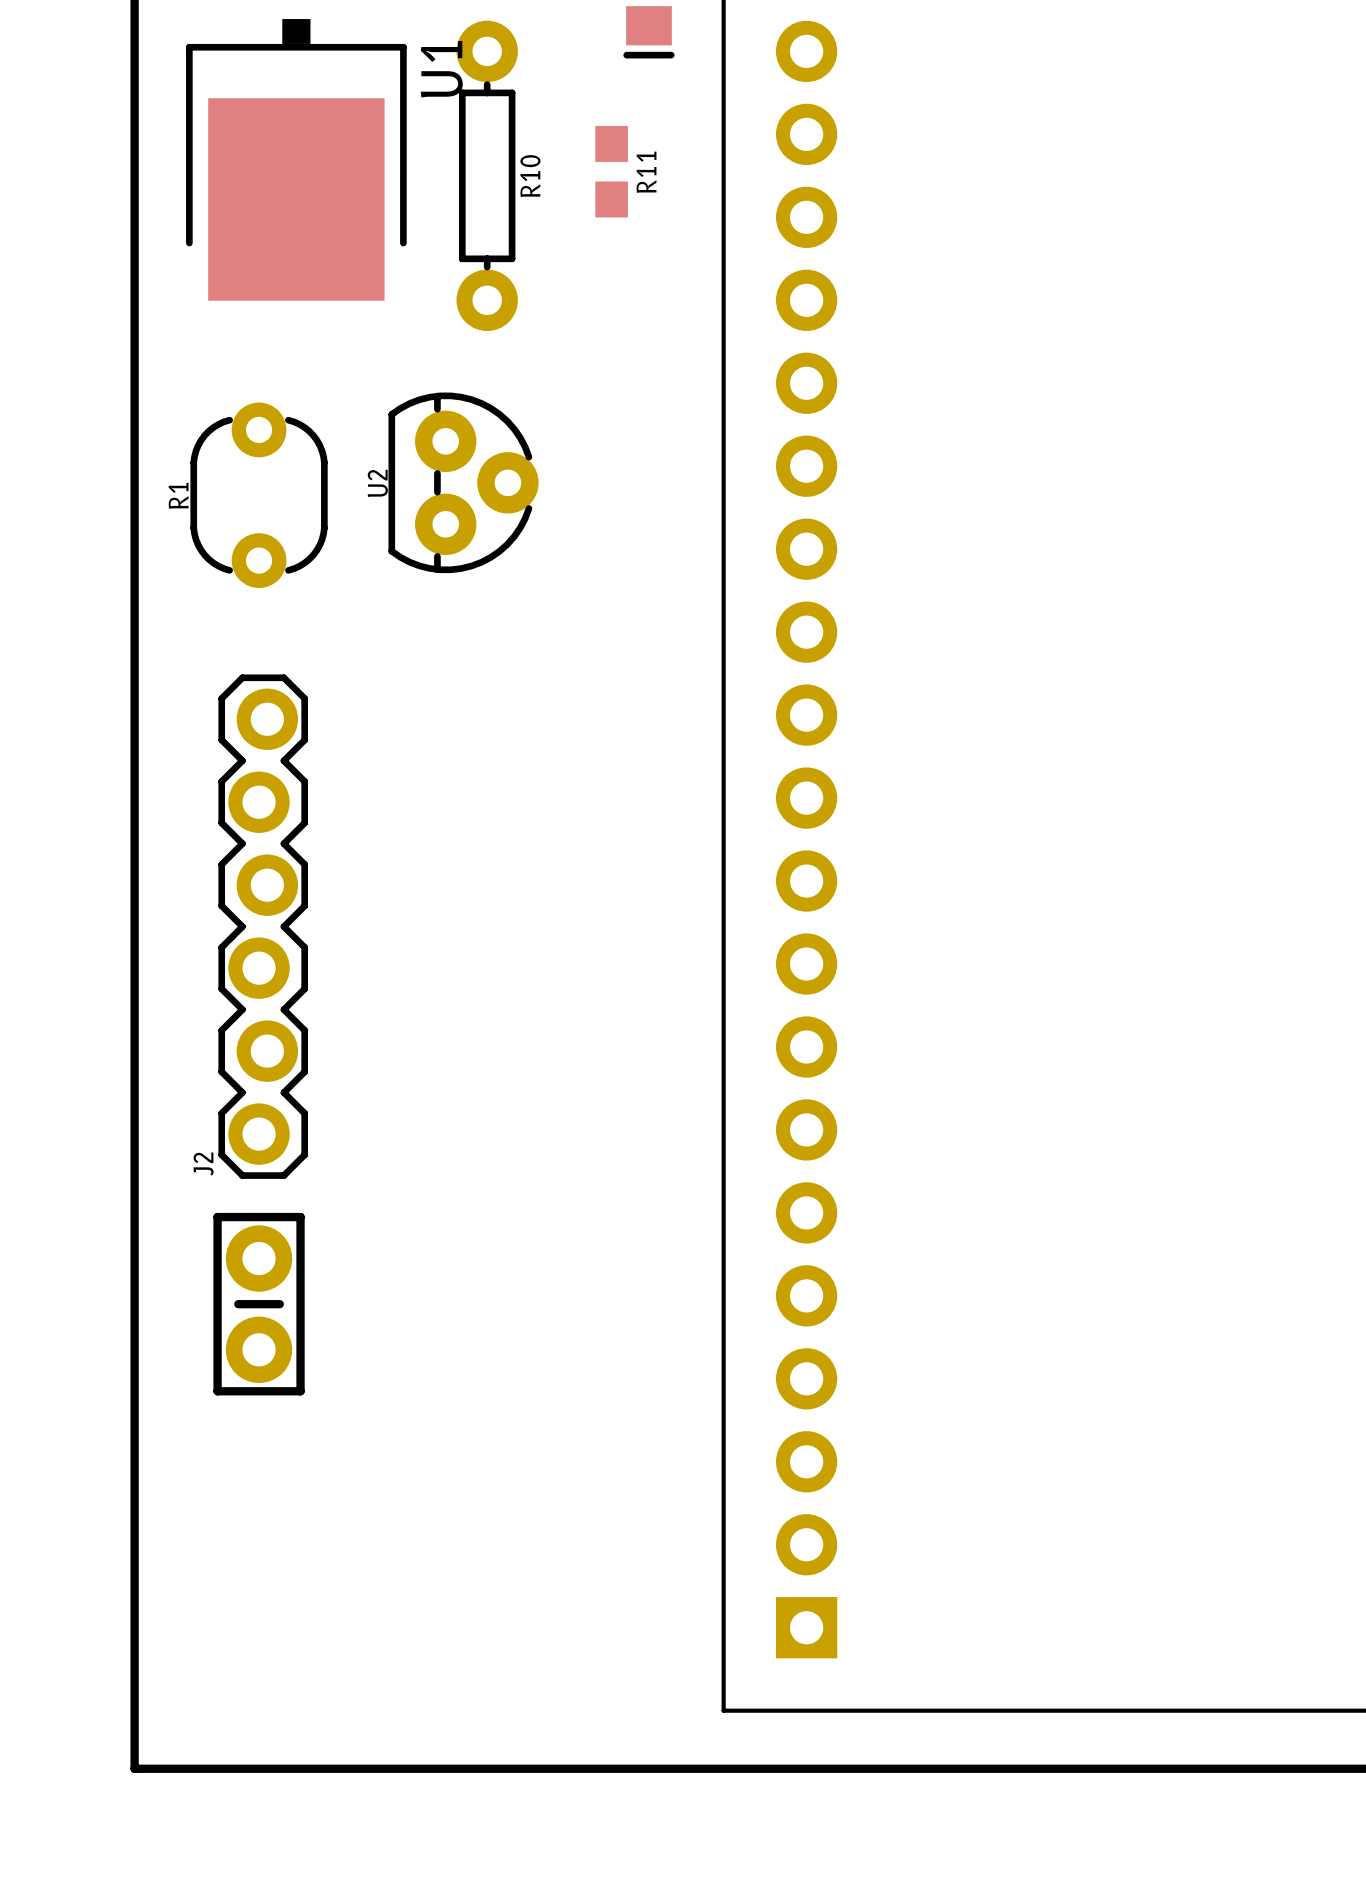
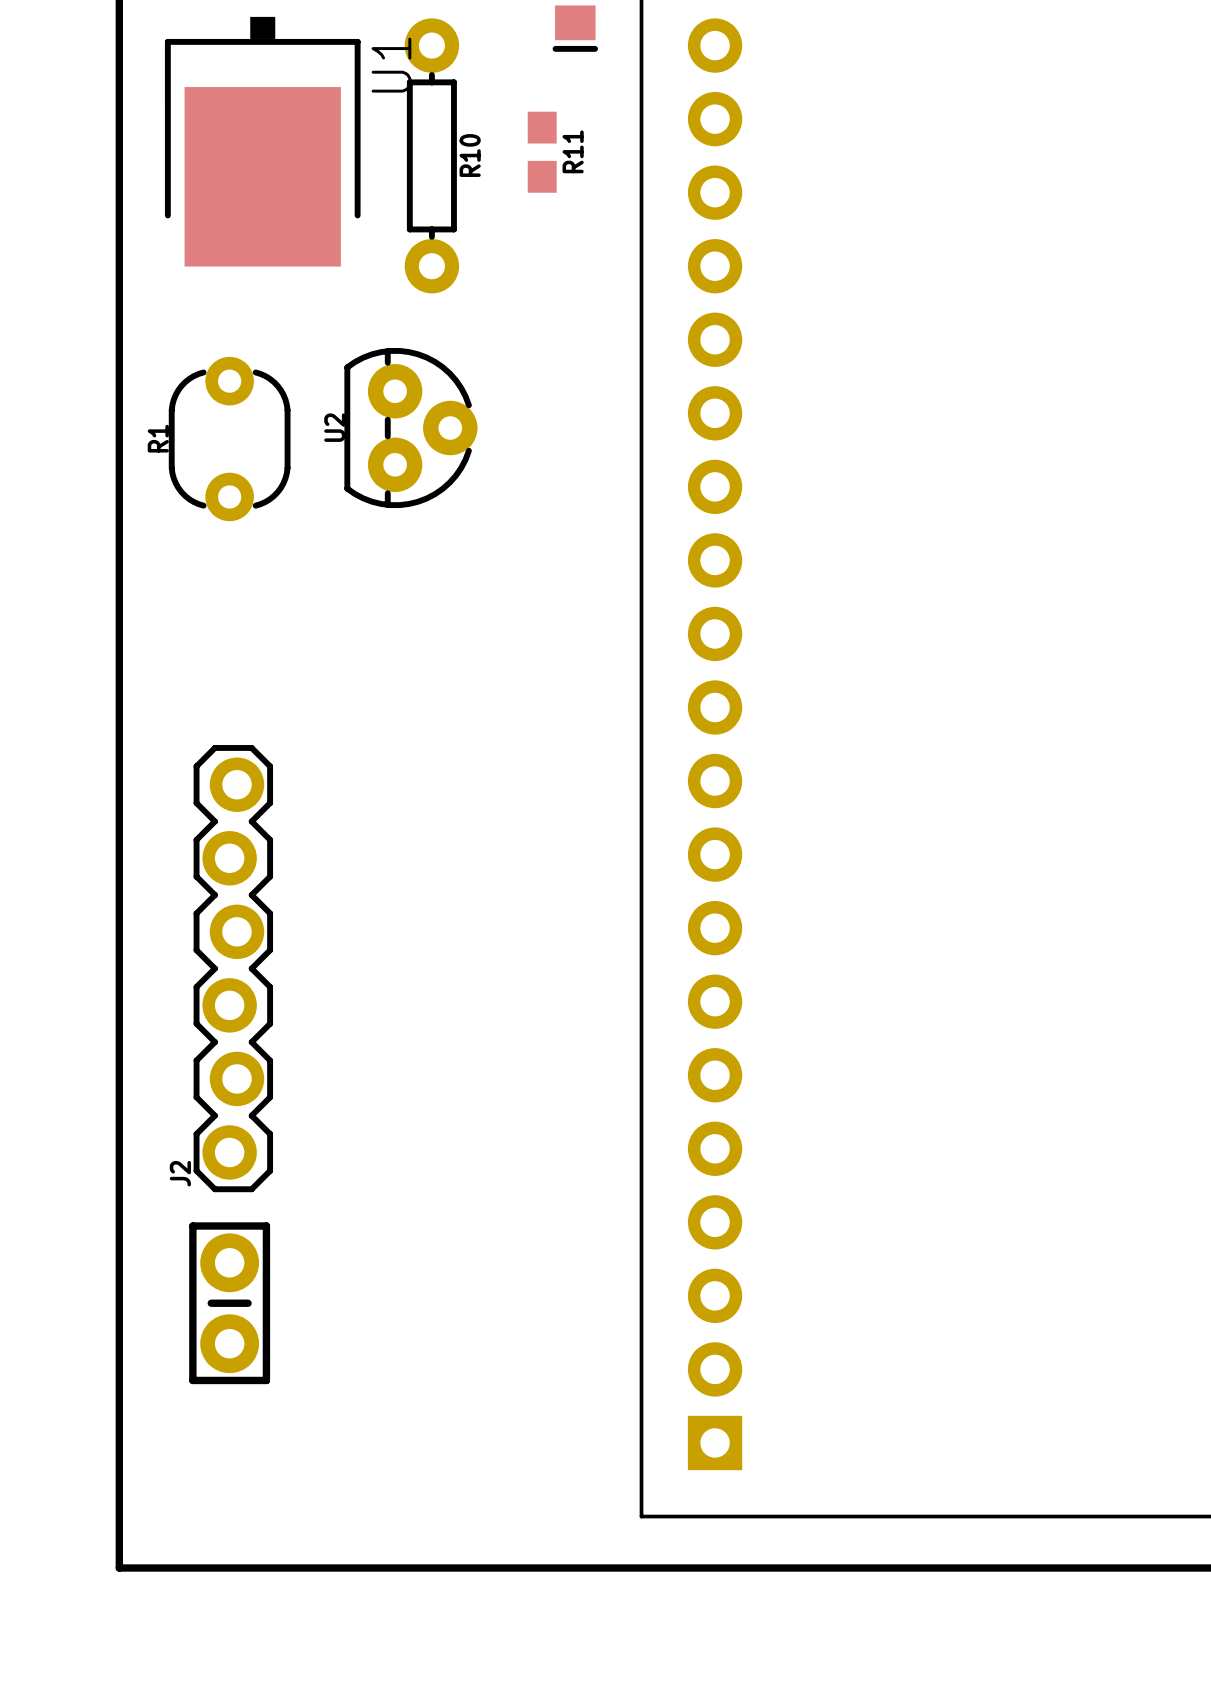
J2 position: (263, 926) -> (233, 968)
part position: (259, 1304) -> (229, 1303)

